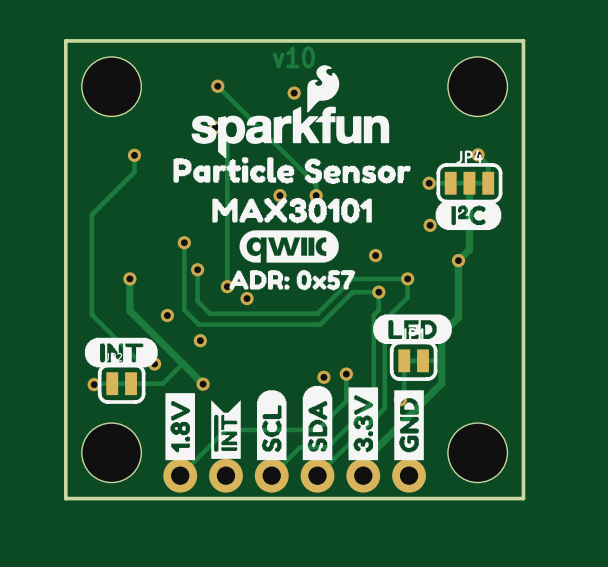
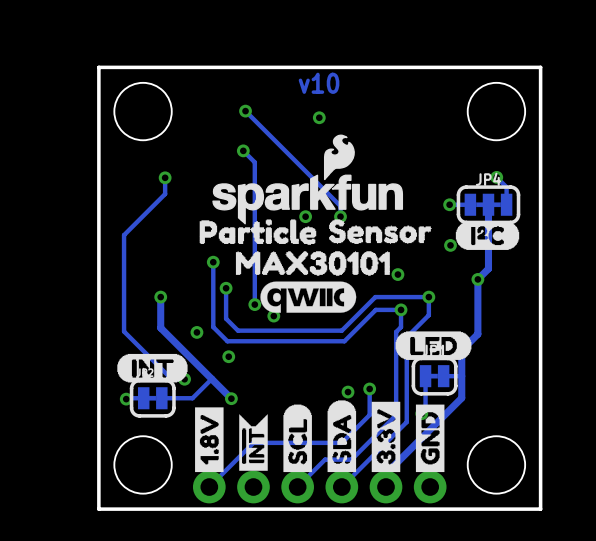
drawing position: (290, 111) -> (307, 179)
drawing position: (233, 170) -> (257, 232)
drawing position: (357, 171) -> (380, 231)
drawing position: (292, 210) -> (312, 263)
drawing position: (289, 246) -> (308, 297)
drawing: [229, 270, 356, 291] -> none

